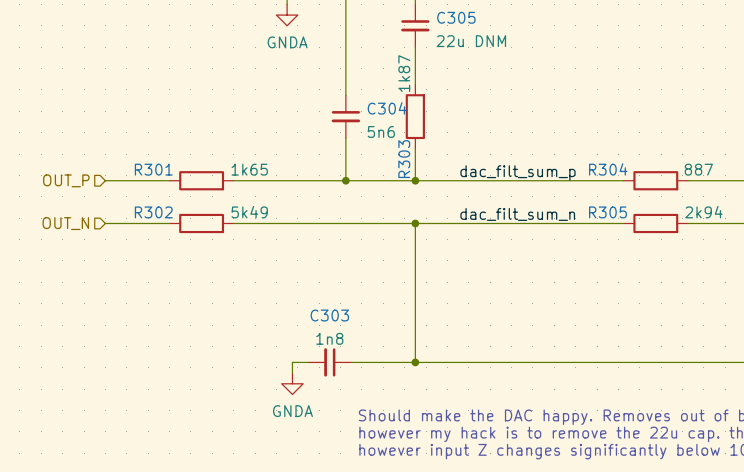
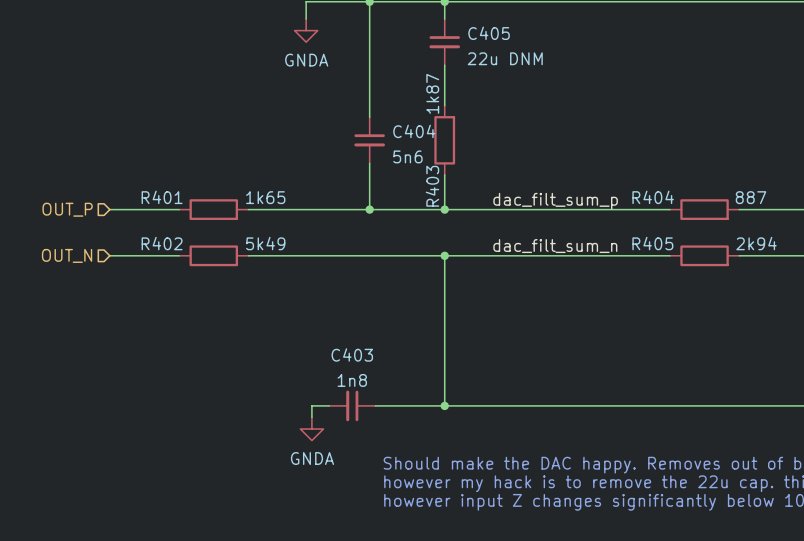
C305 name: C305 (456, 17) -> C405 (489, 33)
C304 name: C304 (387, 108) -> C404 (414, 131)
R303 name: R303 (404, 159) -> R403 (432, 186)
R301 name: R301 (153, 169) -> R401 (162, 197)
R304 name: R304 (608, 169) -> R404 (653, 197)
R302 name: R302 (153, 212) -> R402 (162, 243)
R305 name: R305 (607, 212) -> R405 (652, 243)
C303 name: C303 (329, 315) -> C403 (352, 354)

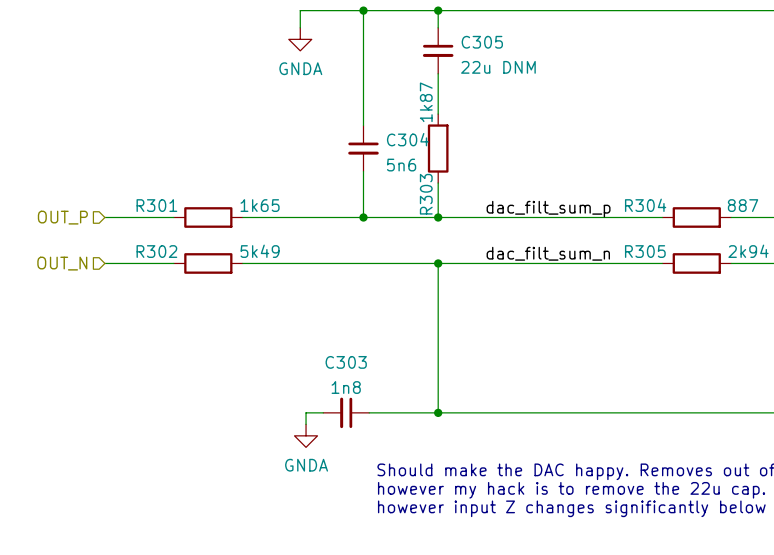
C405 name: C405 (489, 33) -> C305 (482, 42)
C404 name: C404 (414, 131) -> C304 (407, 139)
R403 name: R403 (432, 186) -> R303 (426, 194)
R401 name: R401 (162, 197) -> R301 (156, 205)
R404 name: R404 (653, 197) -> R304 (645, 205)
R402 name: R402 (162, 243) -> R302 (156, 251)
R405 name: R405 (652, 243) -> R305 (645, 251)
C403 name: C403 (352, 354) -> C303 (346, 362)

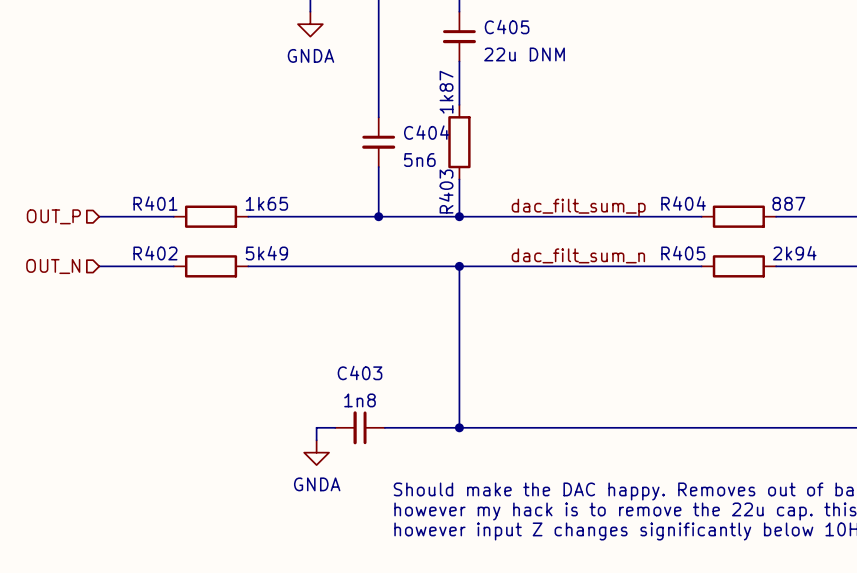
C305 name: C305 (482, 42) -> C405 (507, 27)
C304 name: C304 (407, 139) -> C404 (426, 132)
R303 name: R303 (426, 194) -> R403 (446, 191)
R301 name: R301 (156, 205) -> R401 (155, 203)
R304 name: R304 (645, 205) -> R404 (683, 203)
R302 name: R302 (156, 251) -> R402 (155, 253)
R305 name: R305 (645, 251) -> R405 (683, 253)
C303 name: C303 (346, 362) -> C403 (360, 372)

